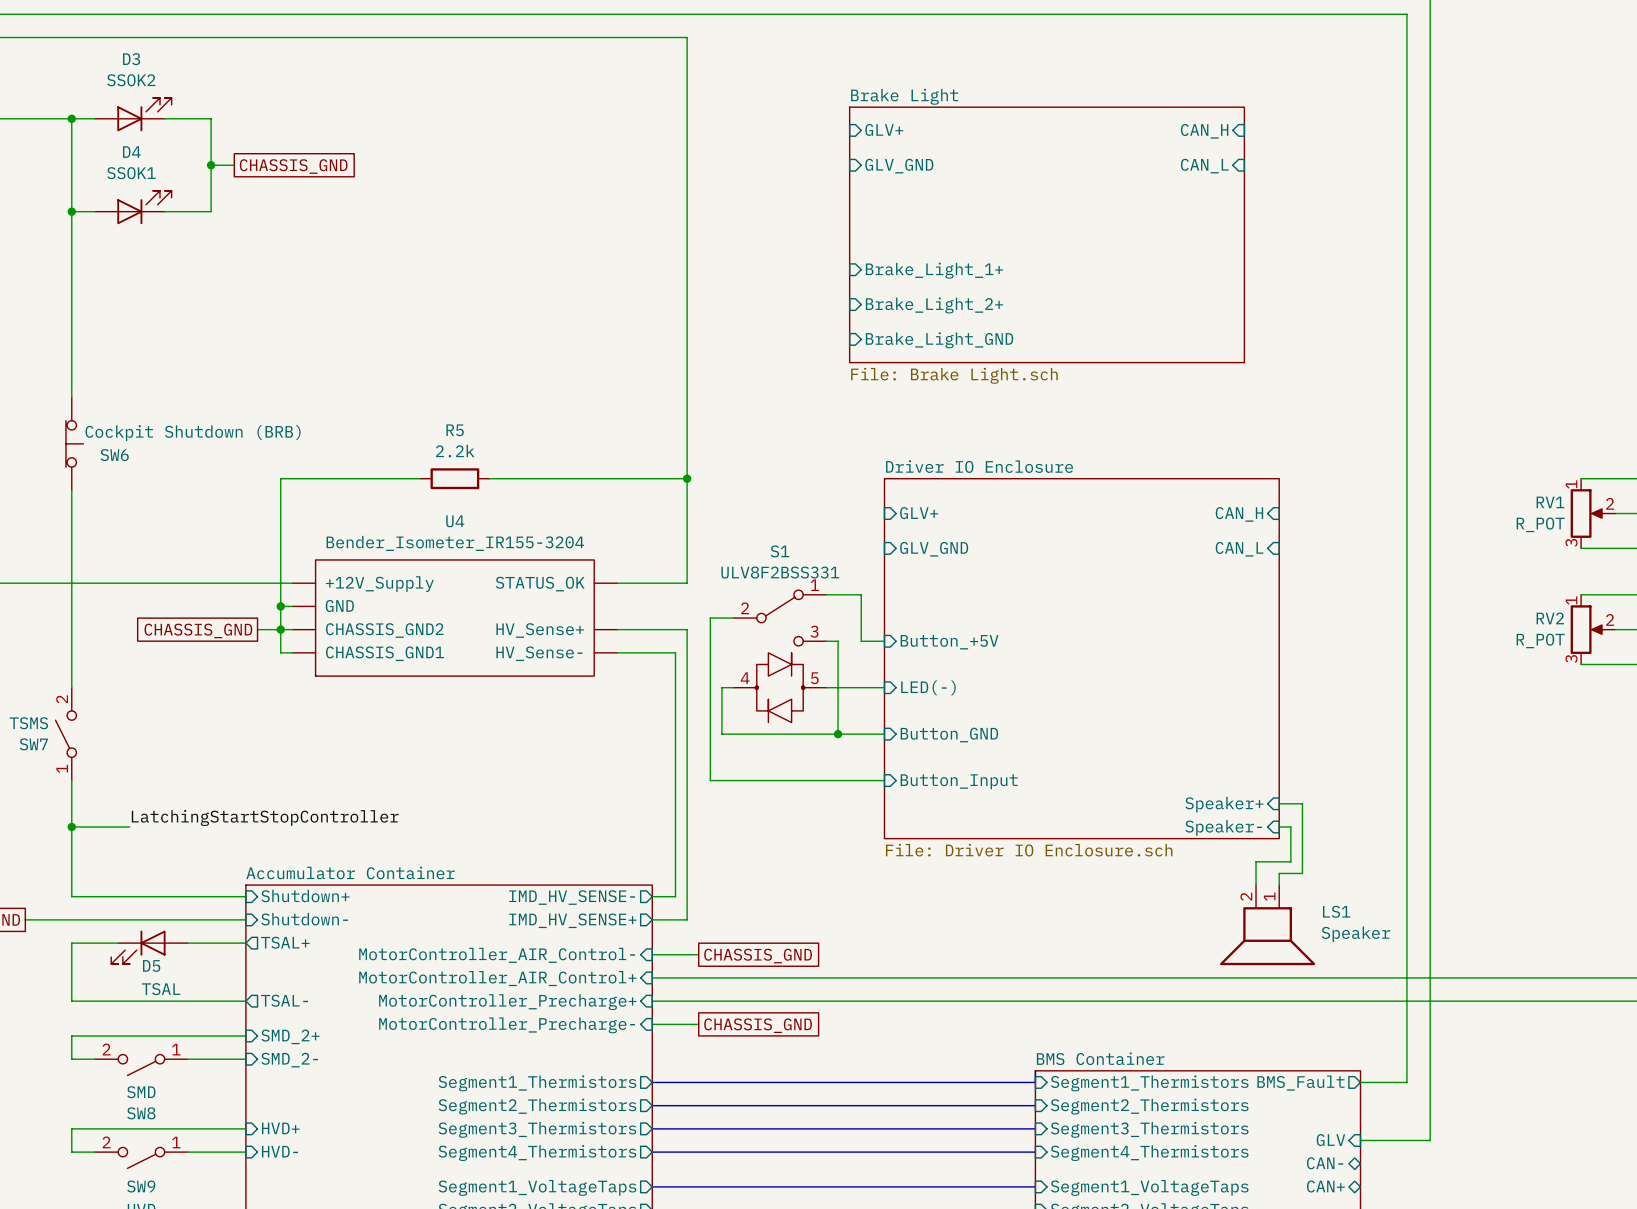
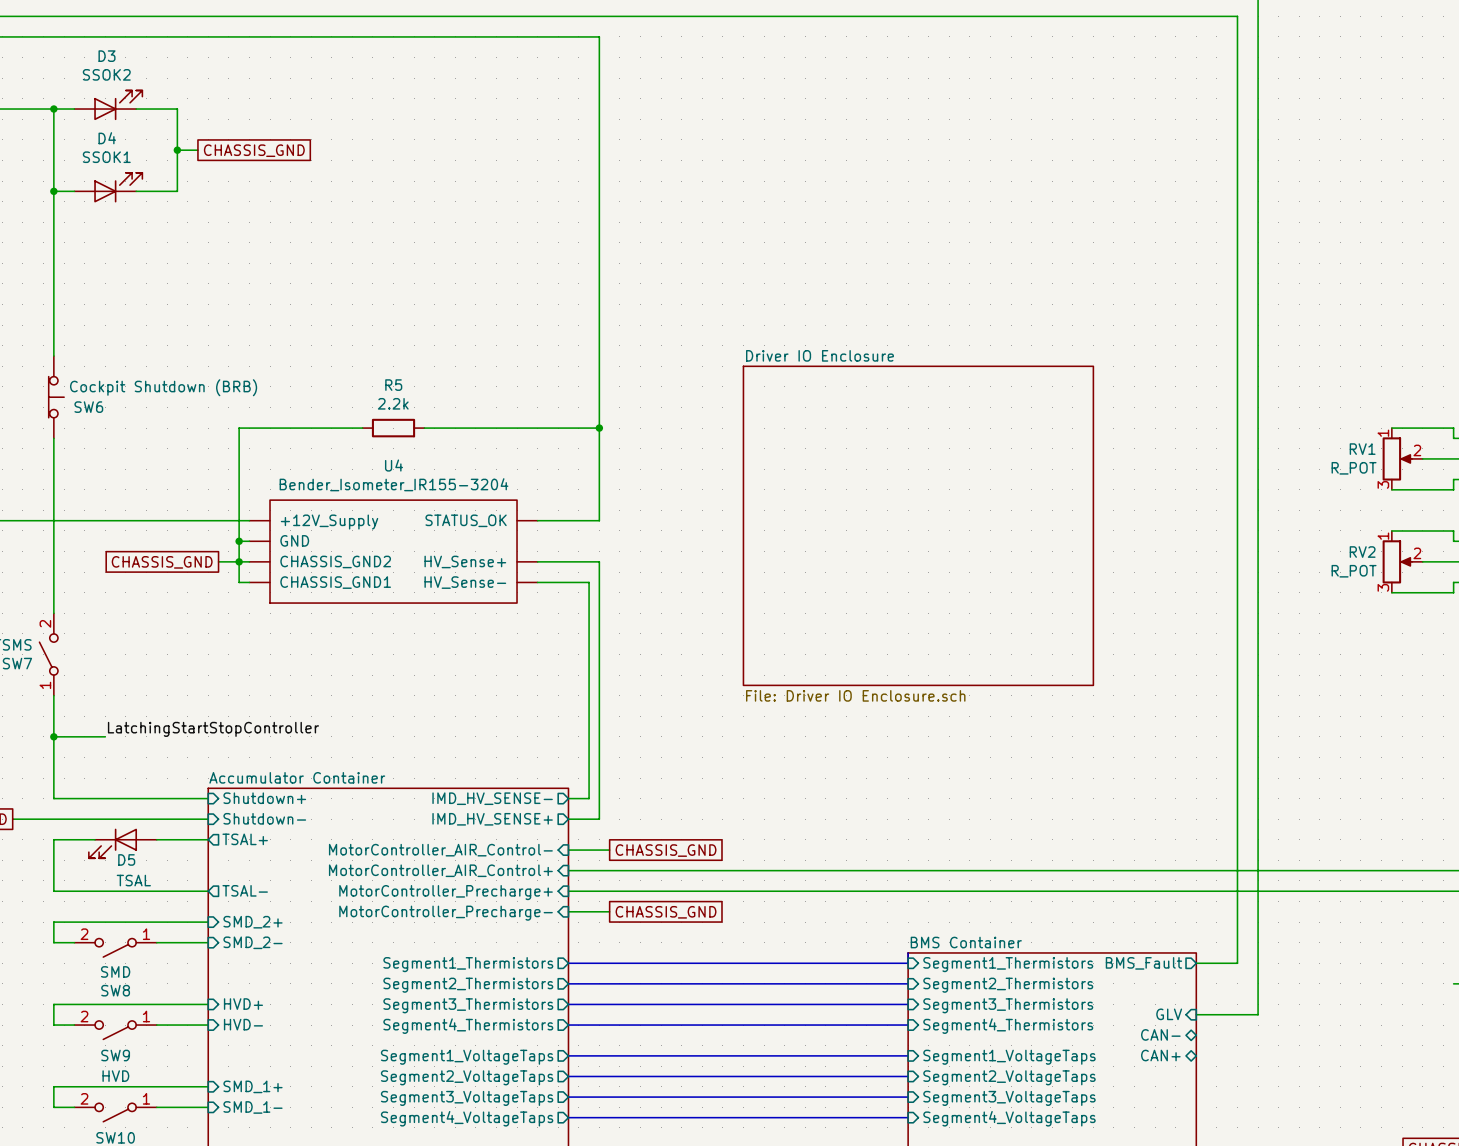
sheet pin: GLV+ (884, 129) -> none
sheet pin: CAN_H (1204, 131) -> none
sheet pin: GLV_GND (899, 166) -> none
sheet pin: CAN_L (1204, 166) -> none
sheet Brake Light: File: Brake Light.sch (1047, 234) -> none
sheet pin: Brake_Light_1+ (934, 270) -> none
sheet pin: Brake_Light_2+ (934, 305) -> none
sheet pin: Brake_Light_GND (939, 340) -> none
sheet pin: GLV+ (919, 513) -> none
sheet pin: CAN_H (1239, 514) -> none
sheet pin: GLV_GND (934, 549) -> none
sheet pin: CAN_L (1239, 549) -> none
wire: (826, 594) (861, 594) (861, 641) (884, 641) -> none
wire: (733, 618) (710, 618) (710, 780) (884, 780) -> none
wire: (826, 641) (838, 641) (838, 734) -> none
sheet pin: Button_+5V (949, 642) -> none
S1: ULV8F2BSS331 (779, 656) -> none
sheet Driver IO Enclosure position: (1081, 658) -> (918, 525)
wire: (733, 687) (721, 687) (721, 734) (884, 734) -> none
wire: (826, 687) (884, 687) -> none
sheet pin: LED(-) (928, 687) -> none
junction: (838, 734) -> none
sheet pin: Button_GND (949, 735) -> none
sheet pin: Button_Input (959, 781) -> none
wire: (1279, 803) (1302, 803) (1302, 873) (1279, 873) (1279, 885) -> none
sheet pin: Speaker+ (1224, 804) -> none
sheet pin: Speaker- (1223, 827) -> none
wire: (1279, 827) (1290, 827) (1290, 861) (1256, 861) (1256, 885) -> none
LS1: Speaker (1267, 925) -> none

